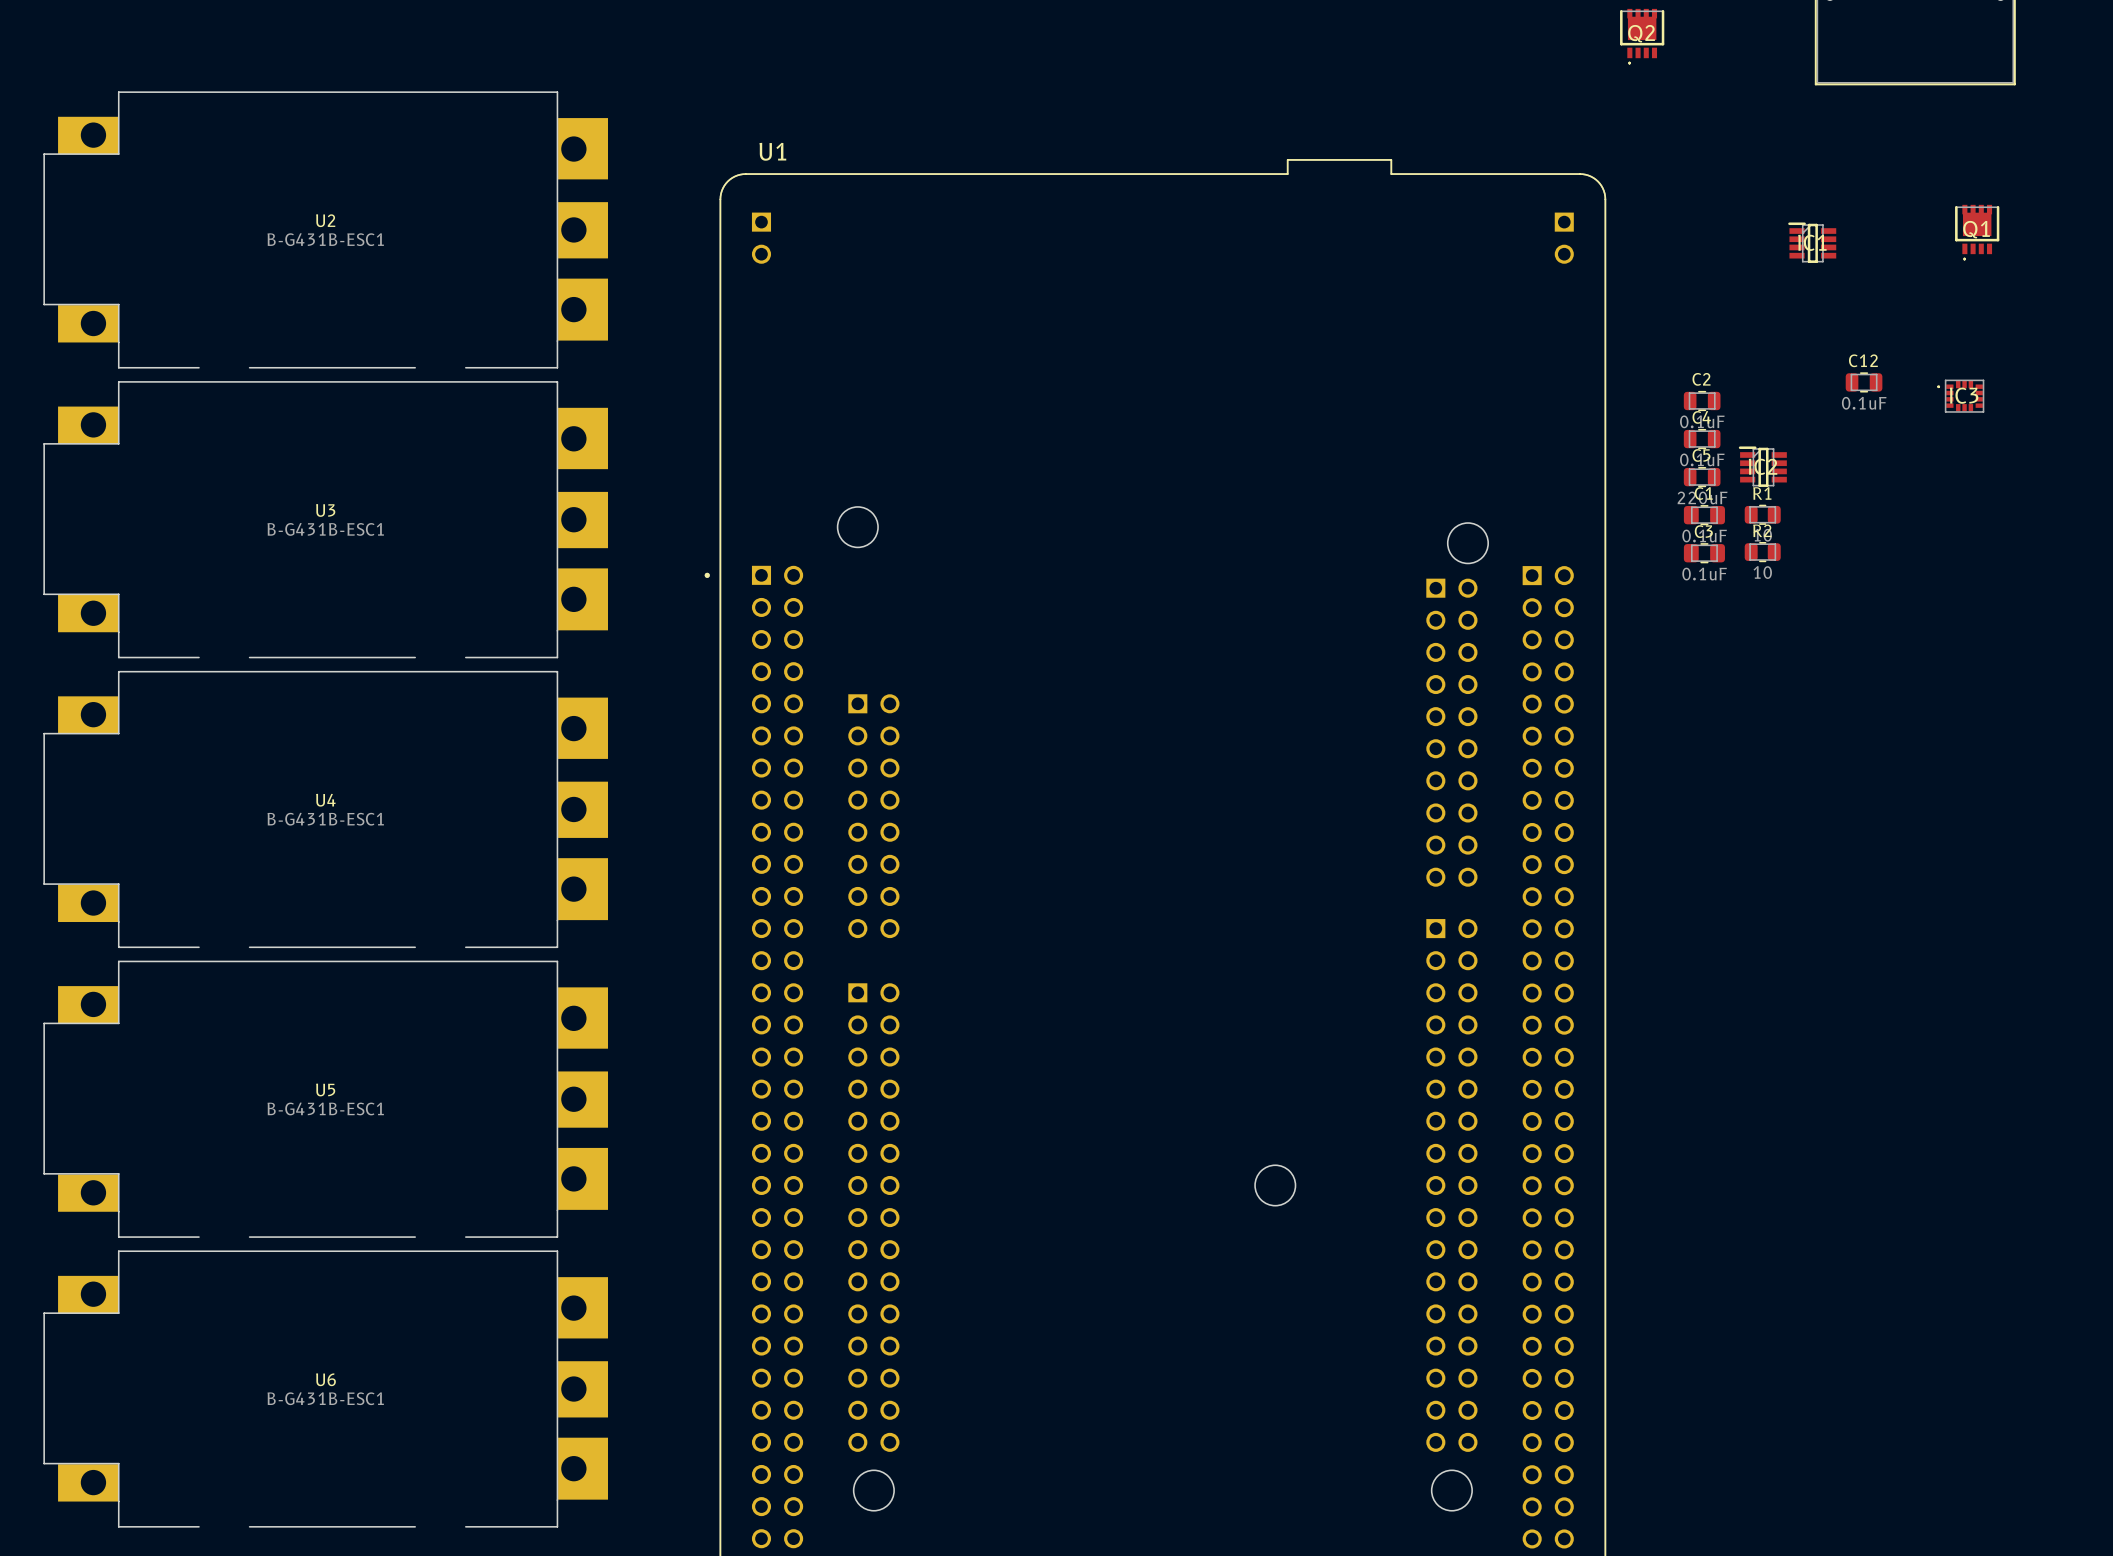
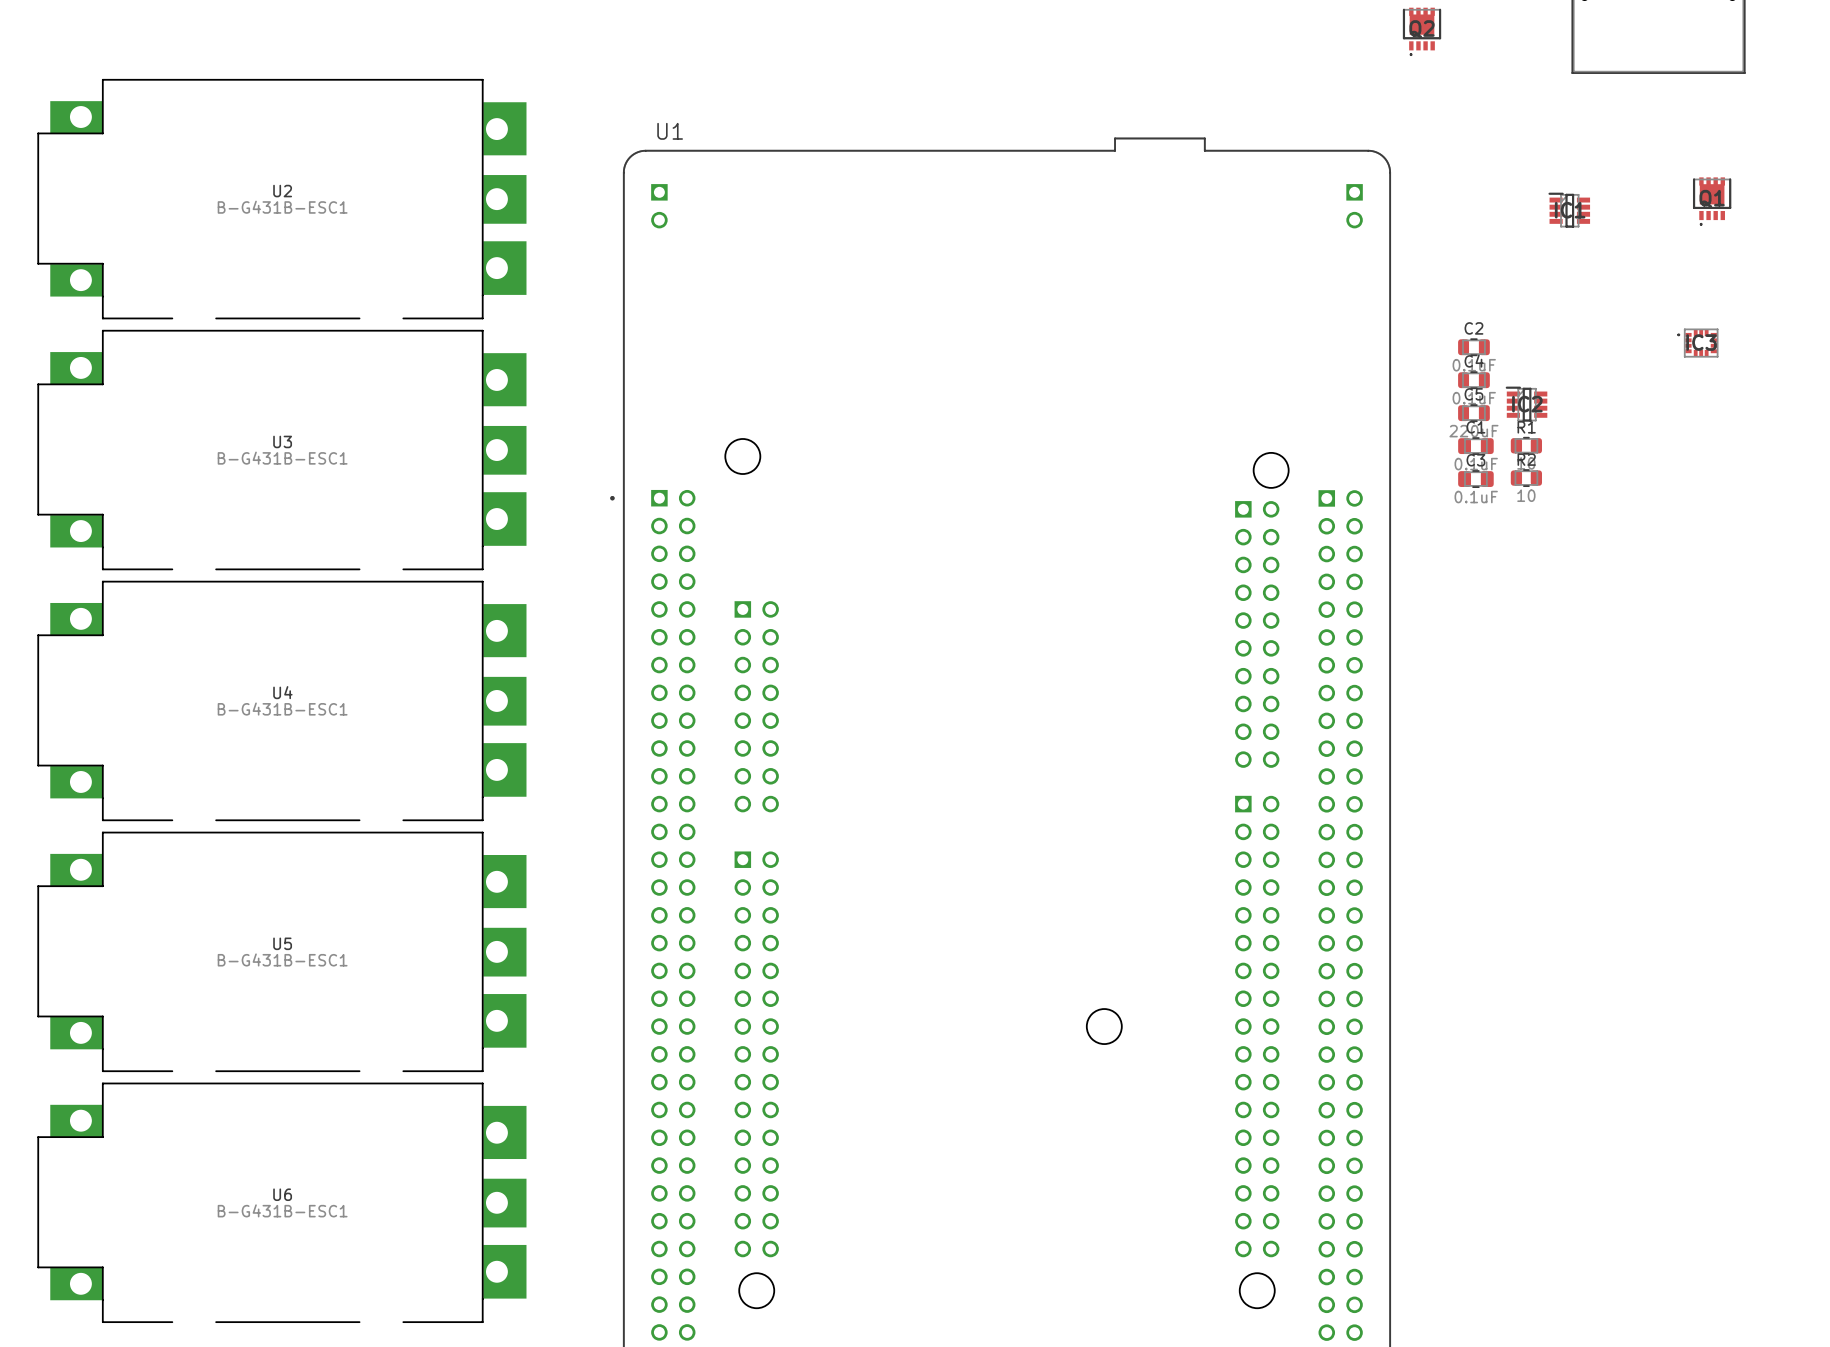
C12: 0.1uF (1864, 382) -> none

